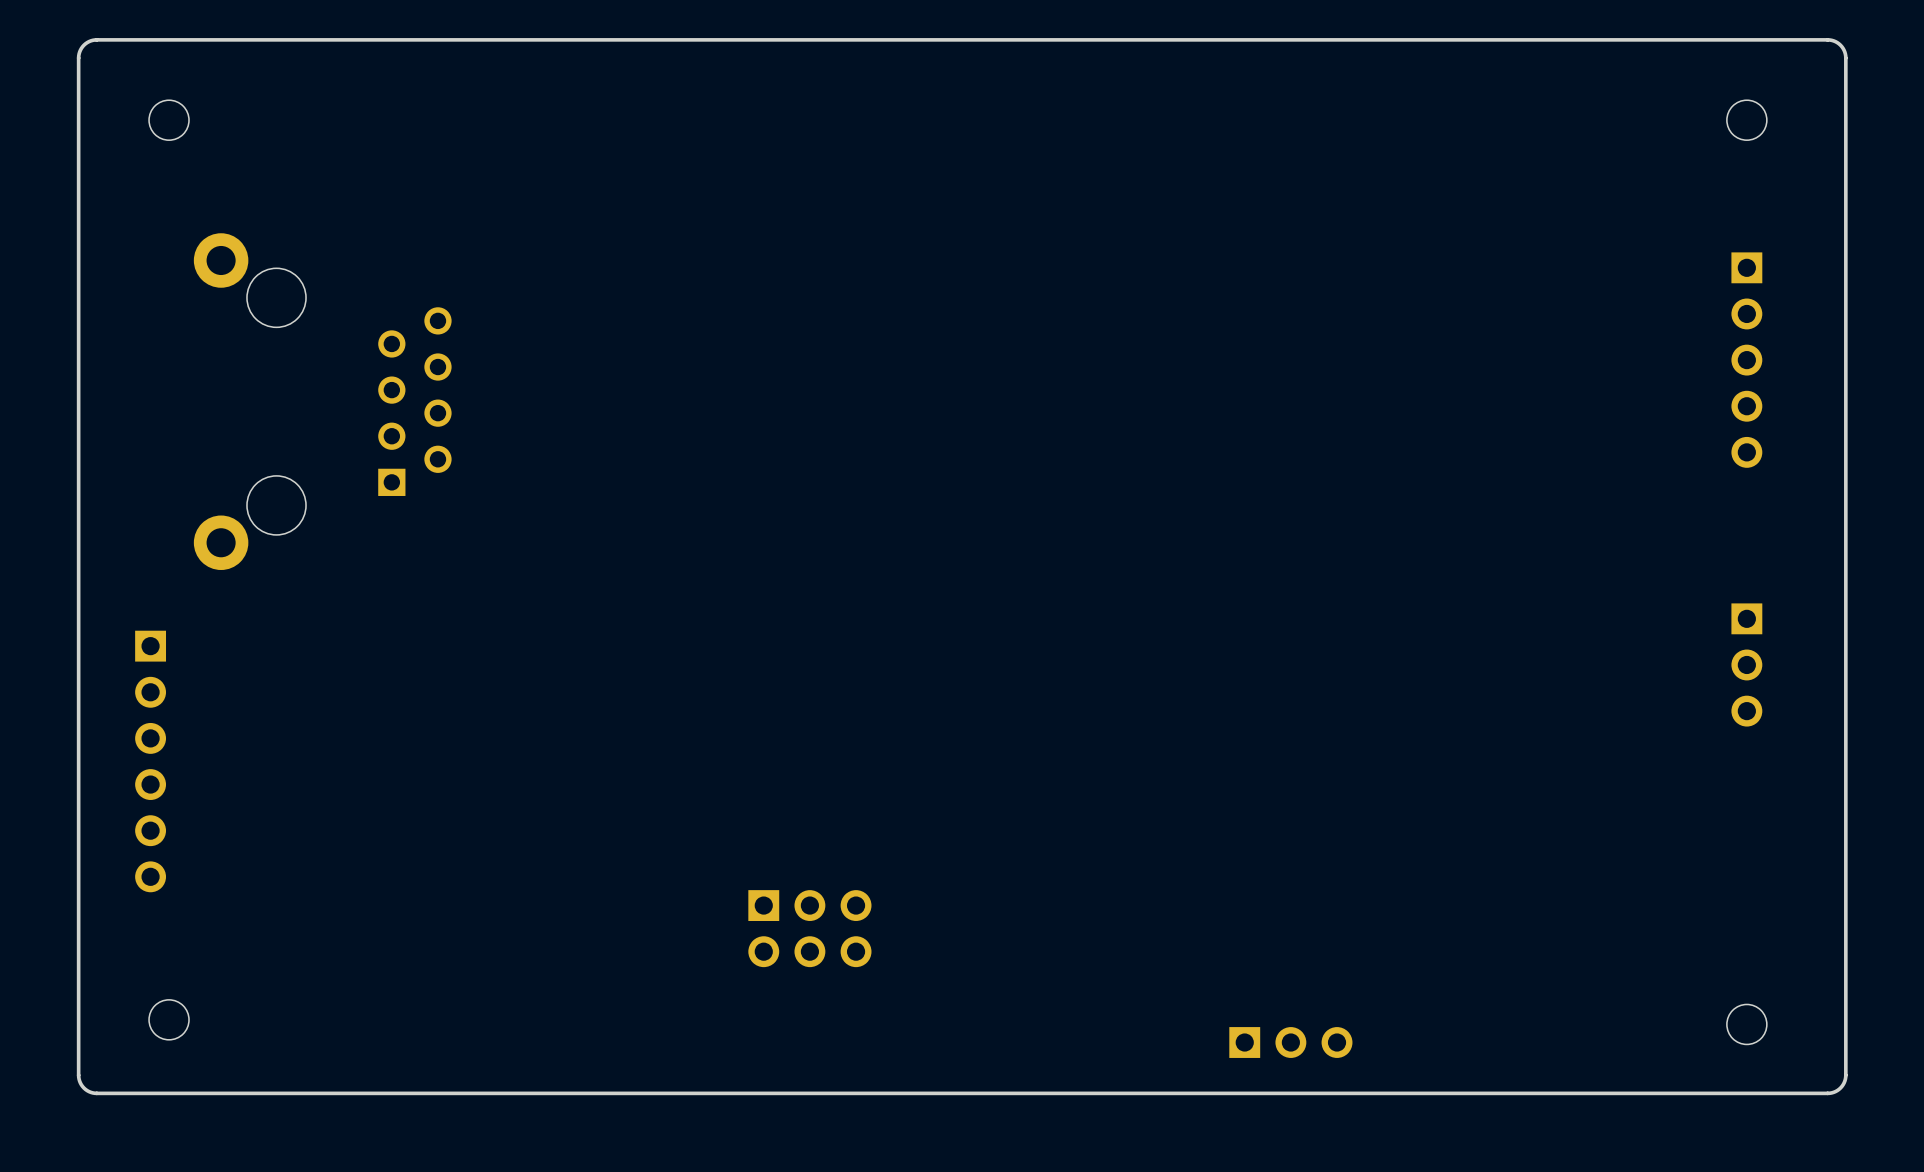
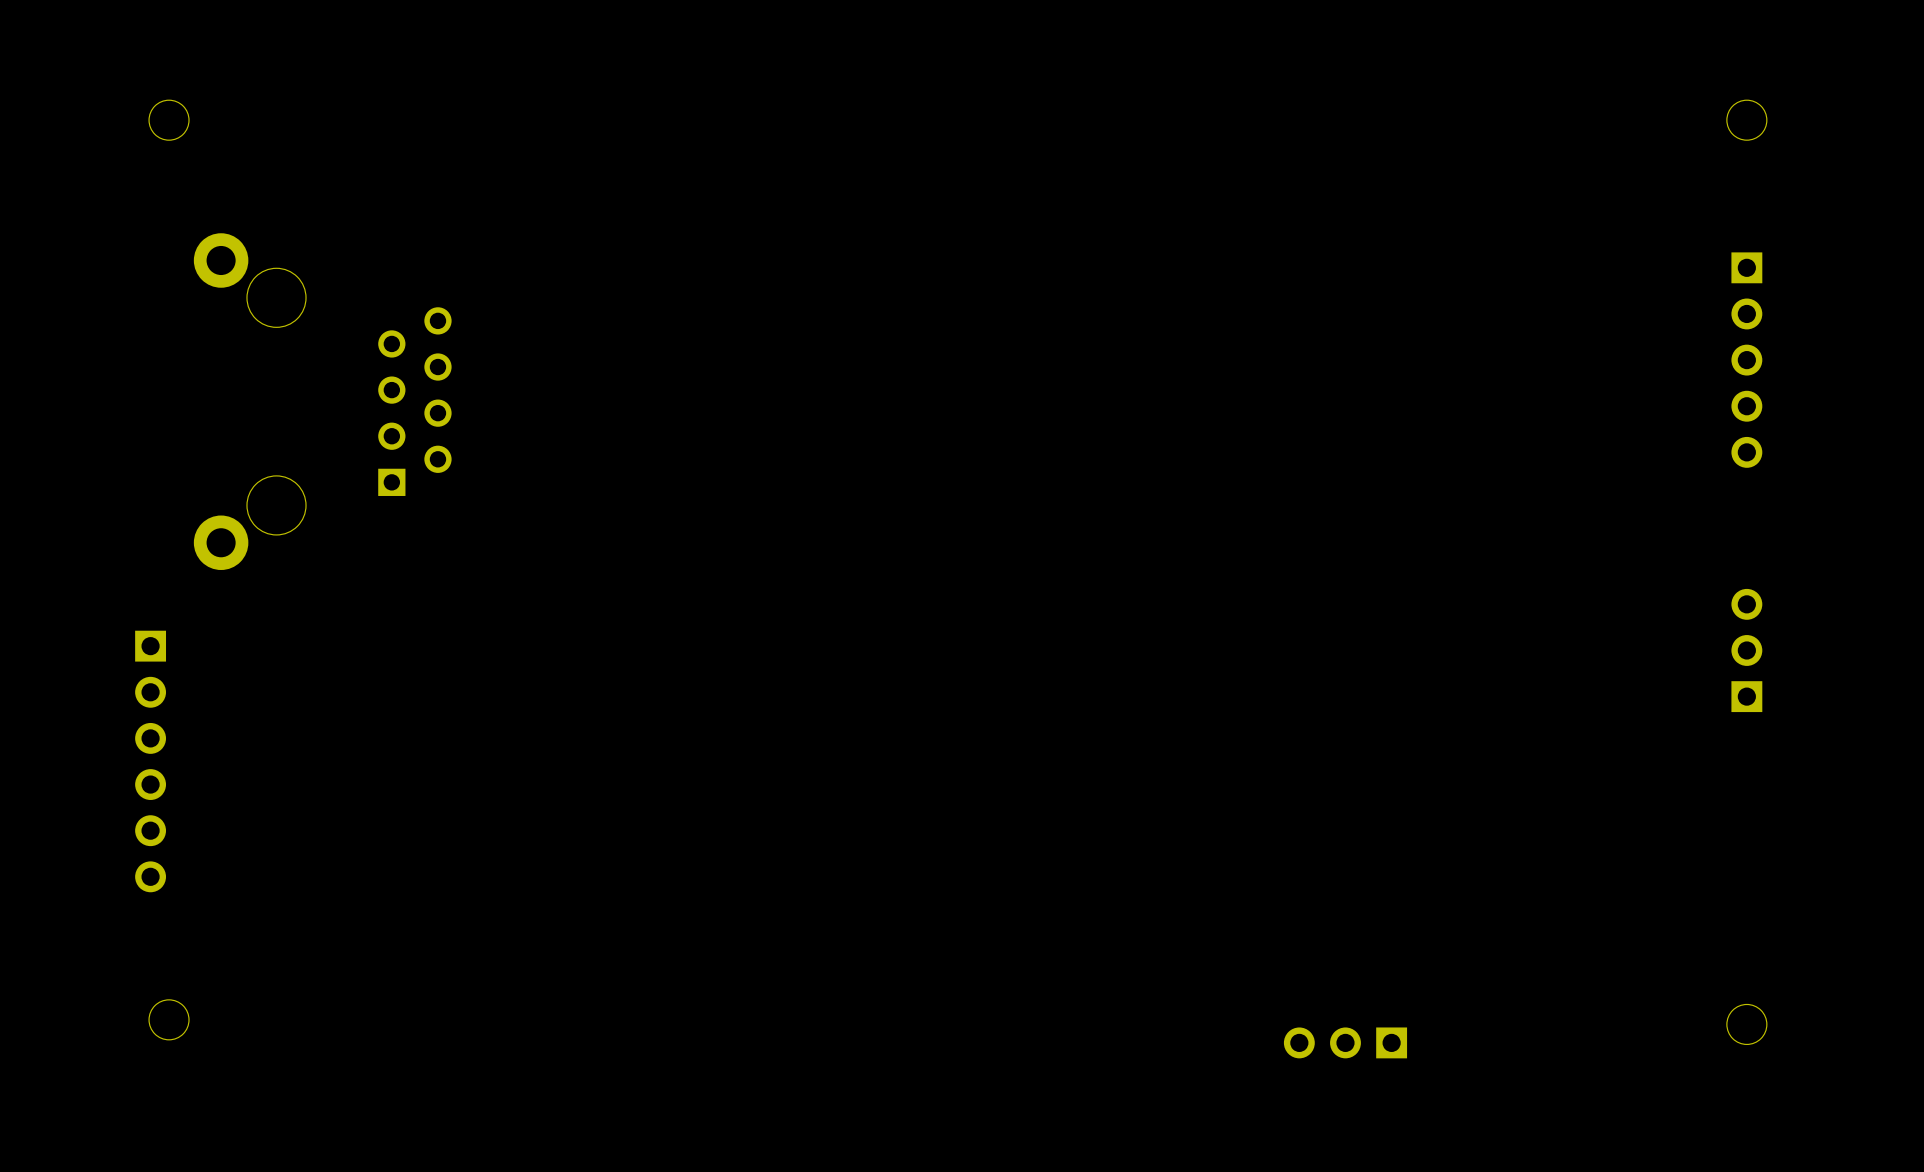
board edge: (1827, 39) (96, 39) (87, 42) (80, 50) (78, 58) (78, 1075) (81, 1084) (88, 1091) (96, 1093) (1827, 1093) (1837, 1090) (1844, 1083) (1845, 1075) (1845, 58) (1840, 45) (1827, 39) -> none
part rotation: 0° (1746, 664) -> 180° (1746, 650)
part: (809, 928) -> none
part rotation: 0° (1290, 1042) -> 180° (1345, 1042)

